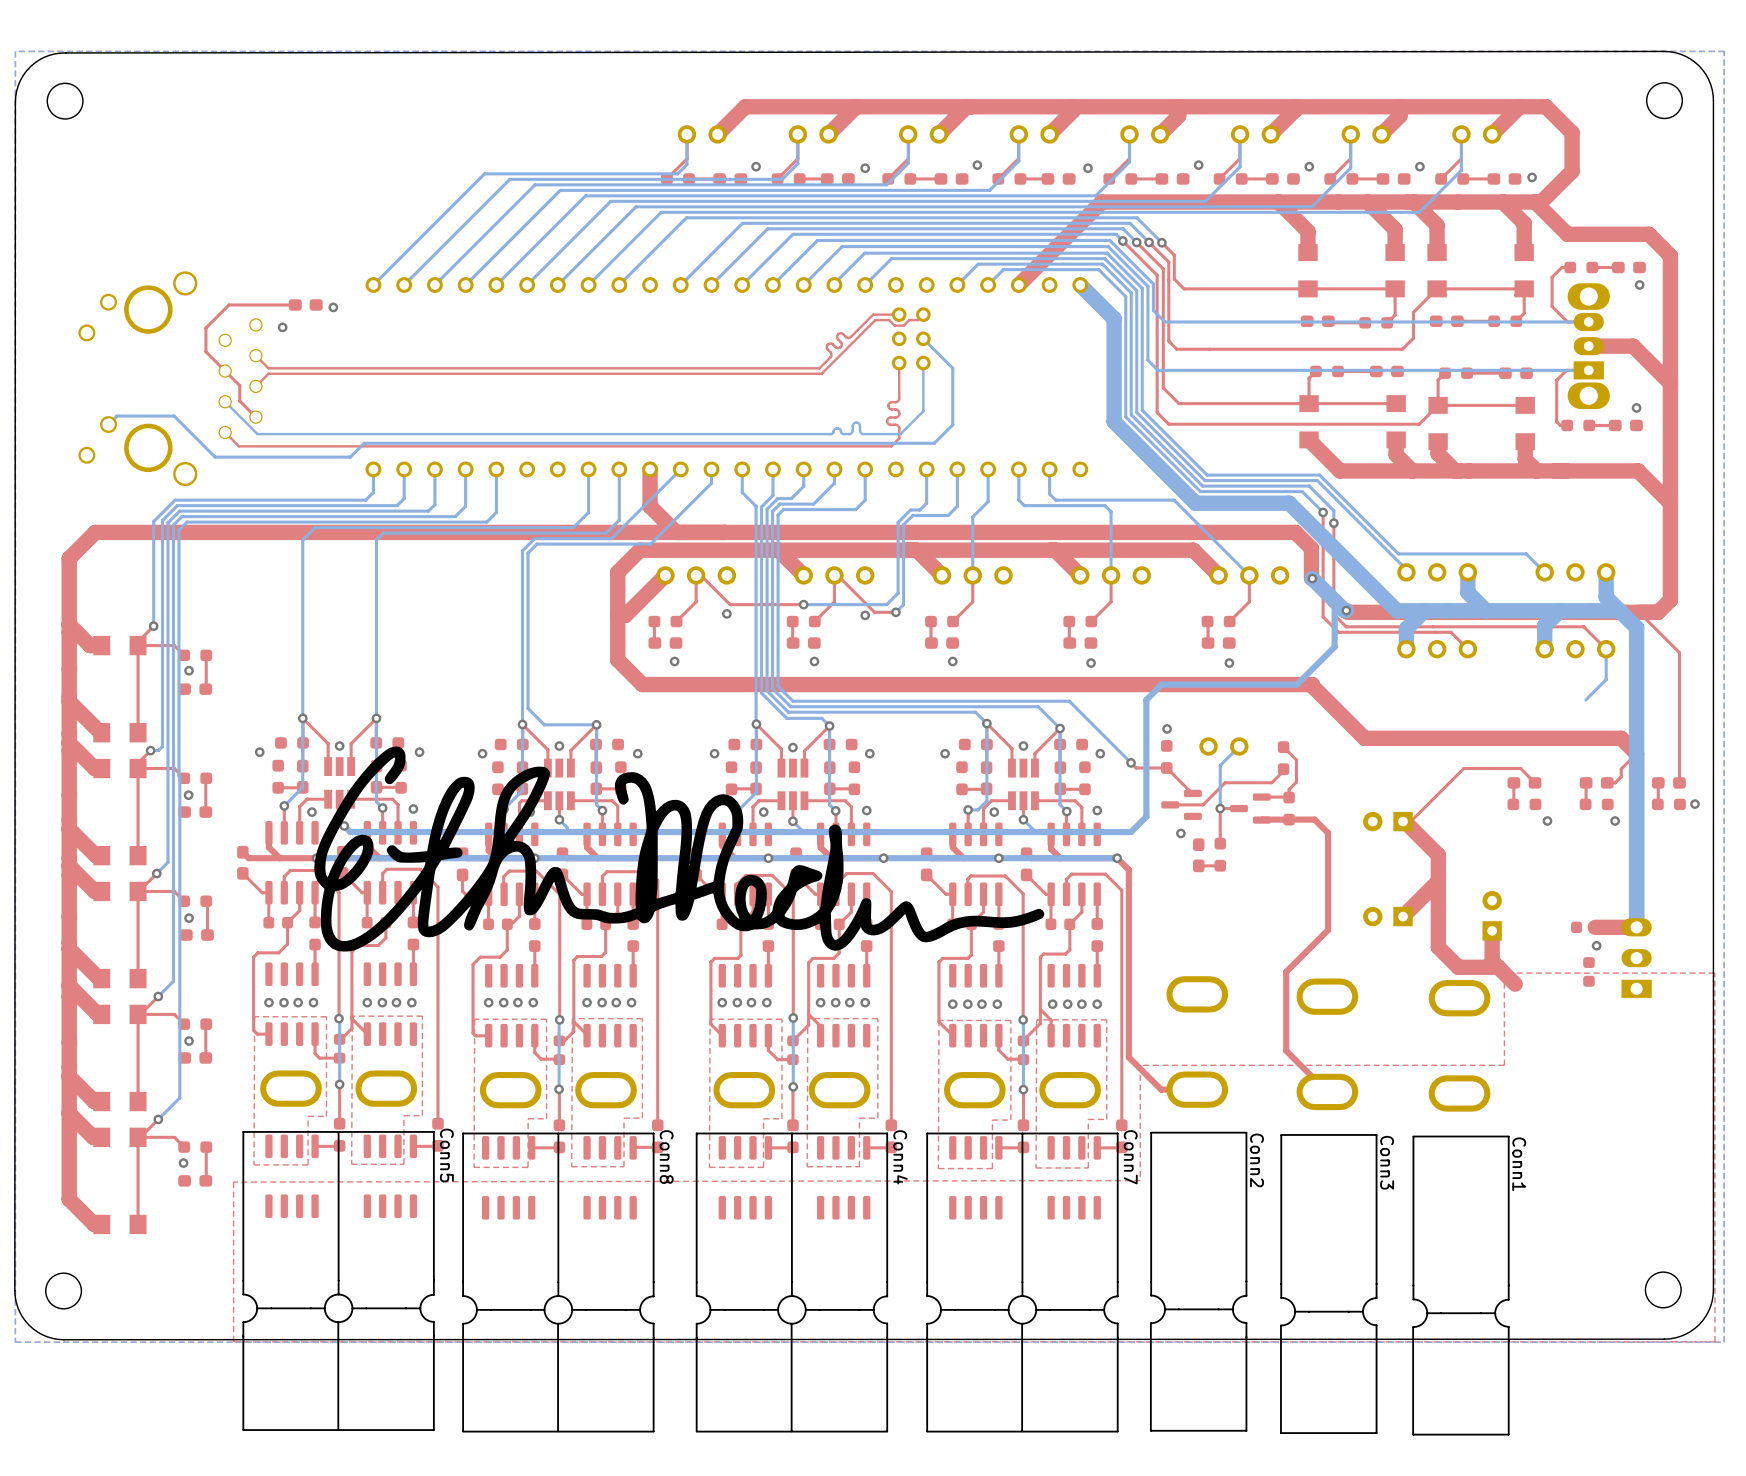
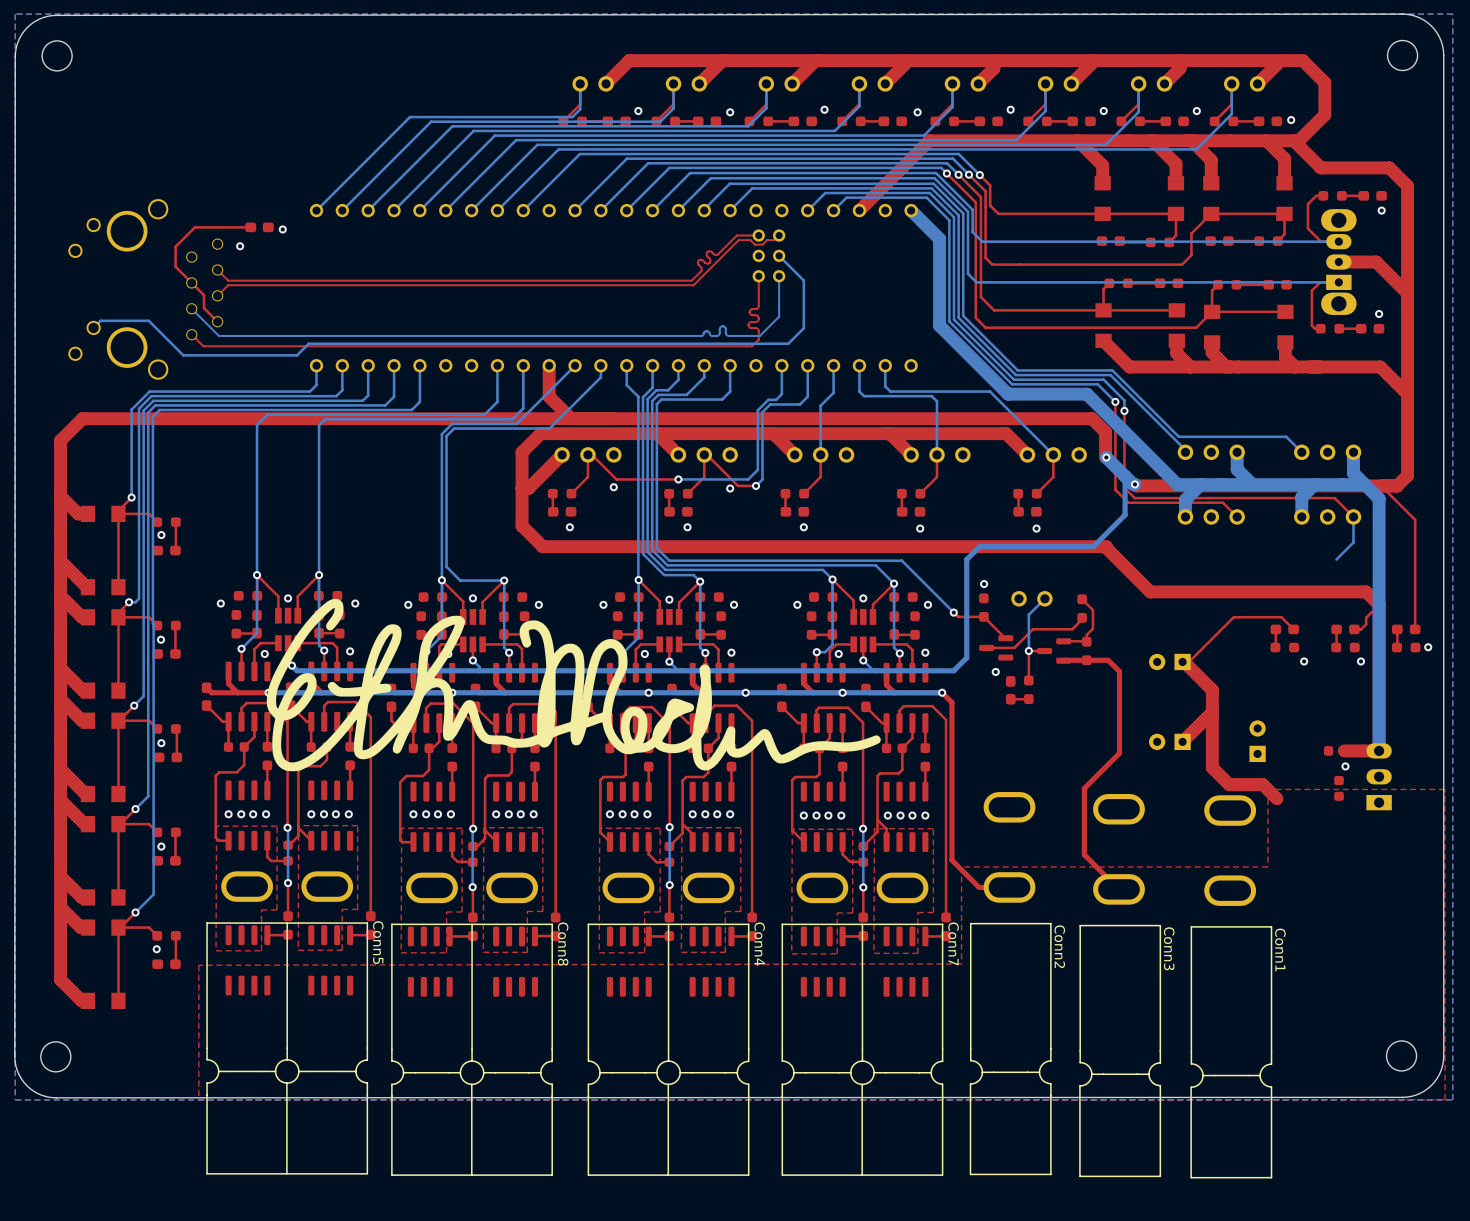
top track: (1492, 930) (1492, 961) (1498, 967) -> none

